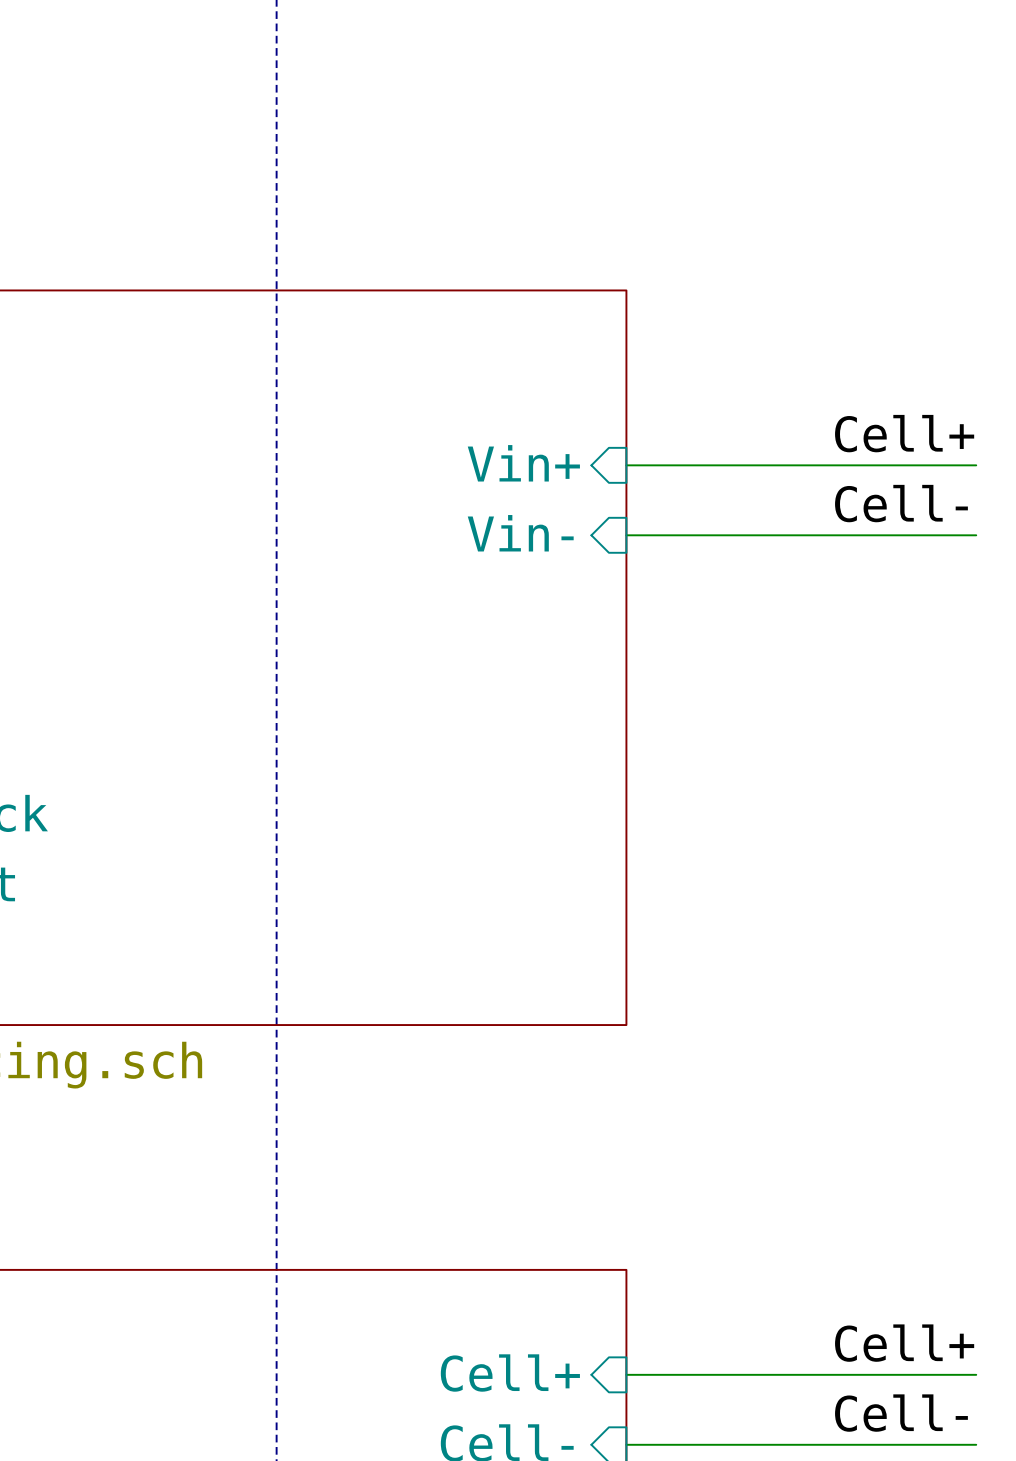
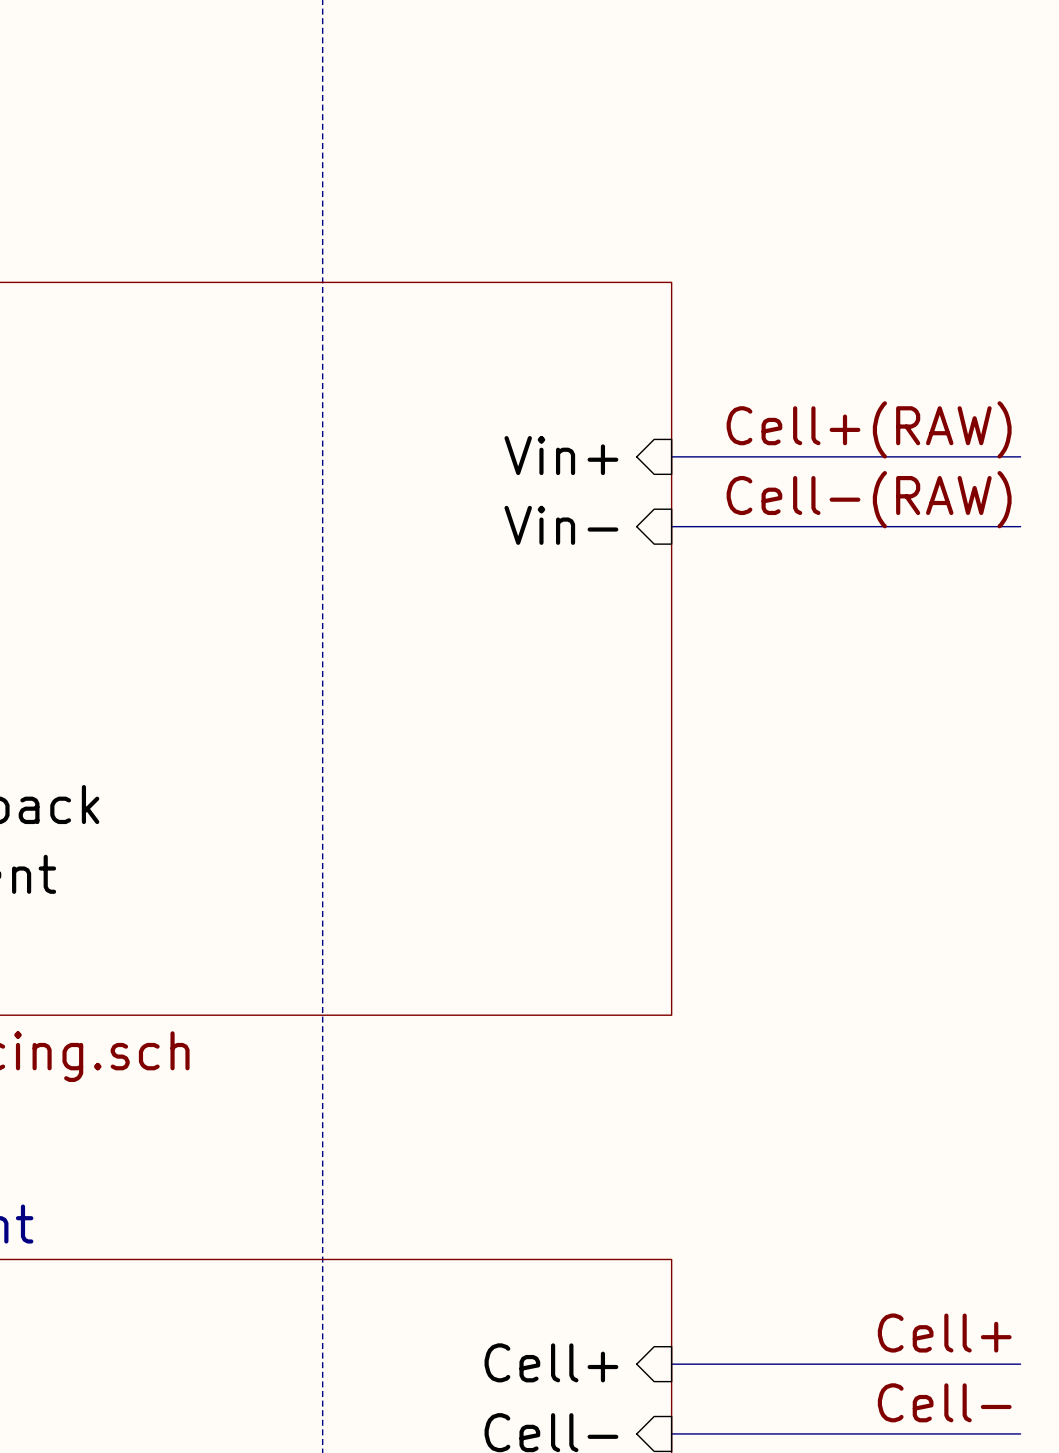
label: Cell+ (904, 433) -> Cell+(RAW) (869, 429)
label: Cell- (901, 503) -> Cell-(RAW) (869, 499)

